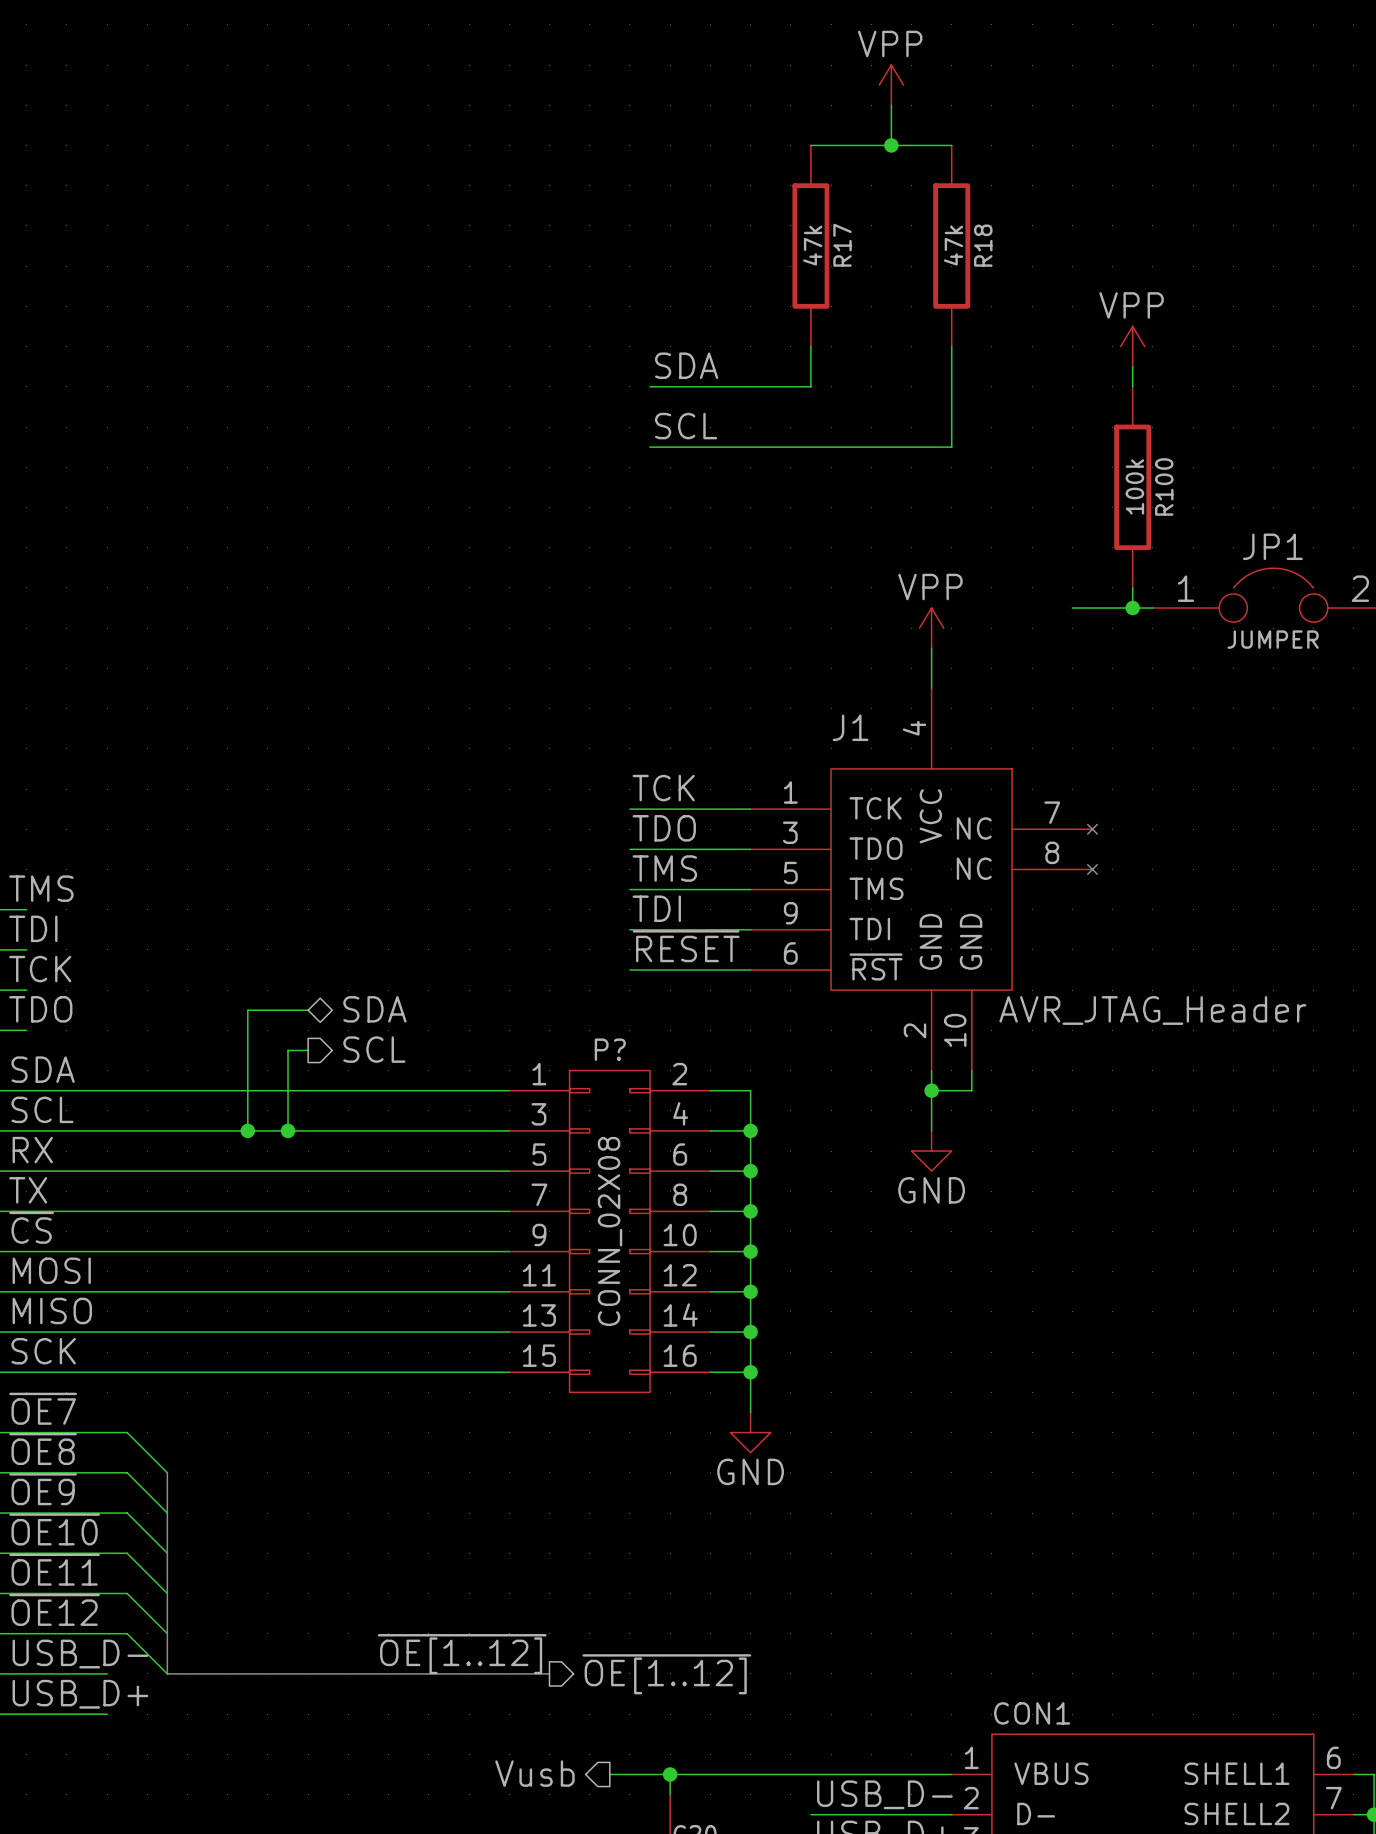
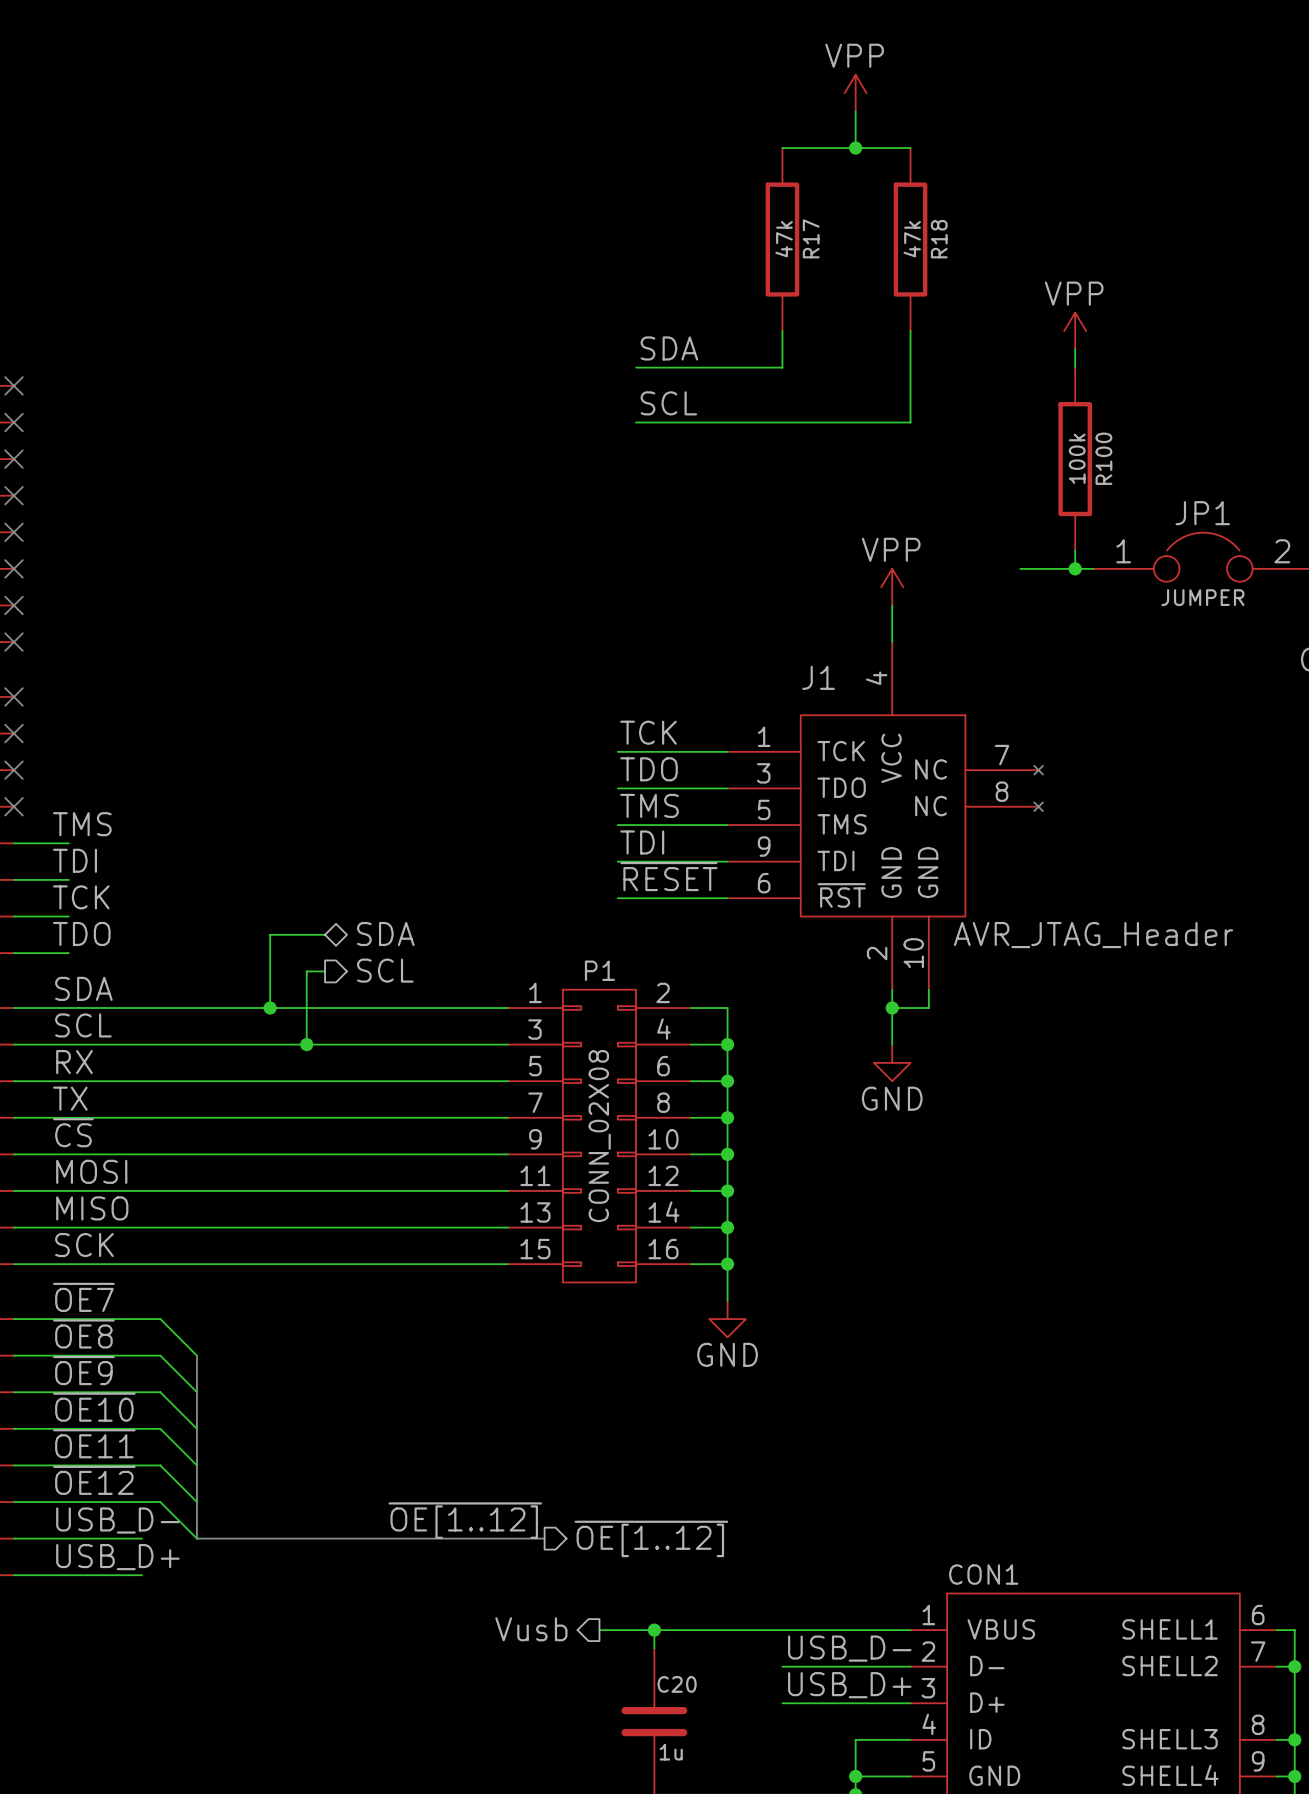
P? name: P? (610, 1049) -> P1 (599, 970)
wire: (247, 1090) (247, 1130) -> none
junction position: (247, 1130) -> (270, 1008)

